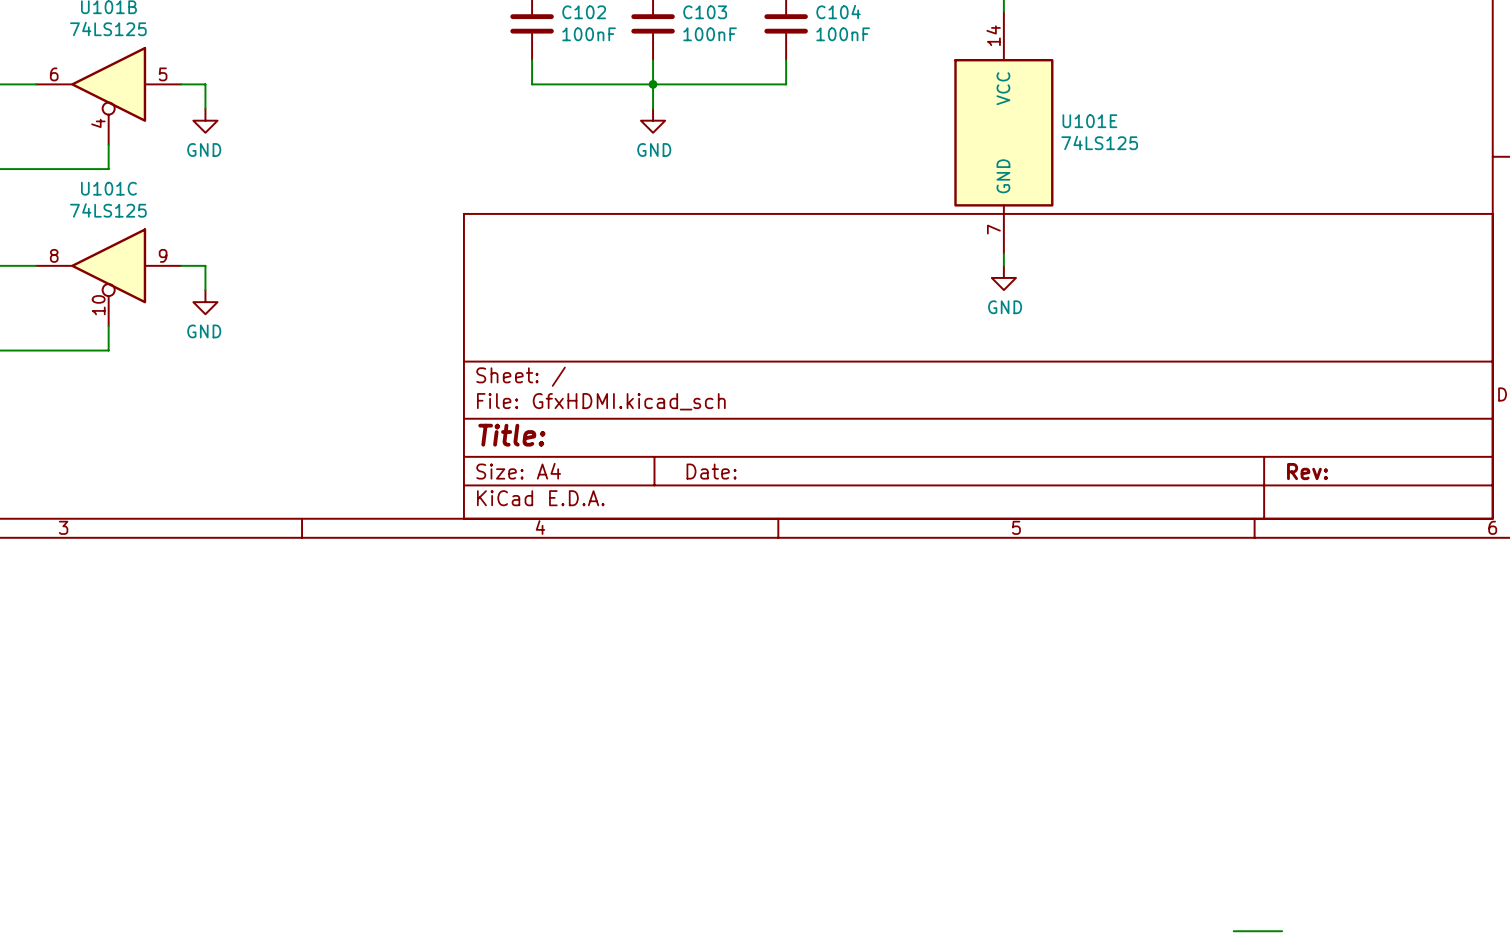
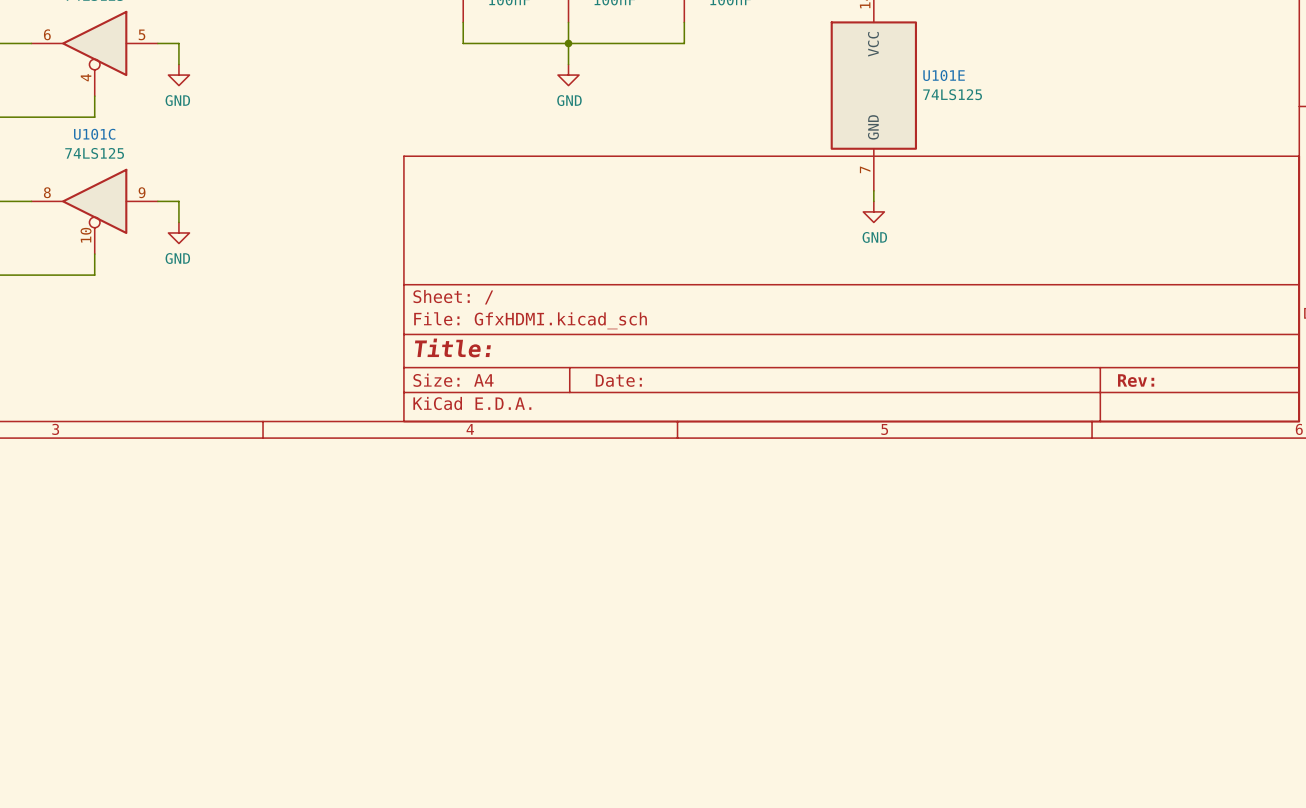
wire: (1233, 931) (1282, 931) -> none

